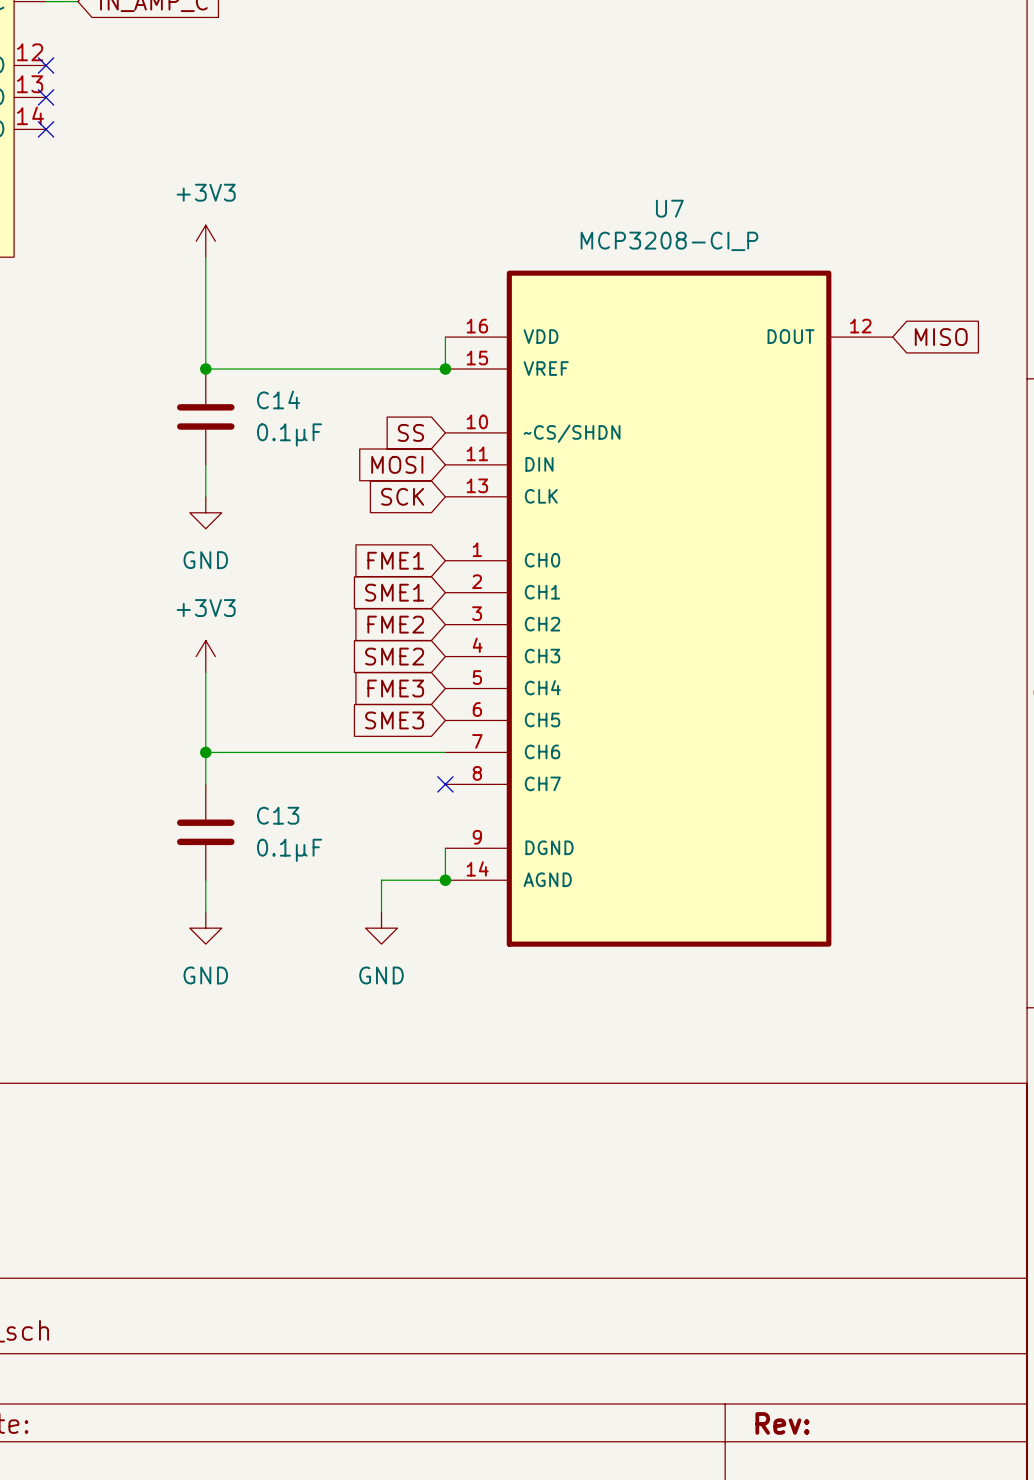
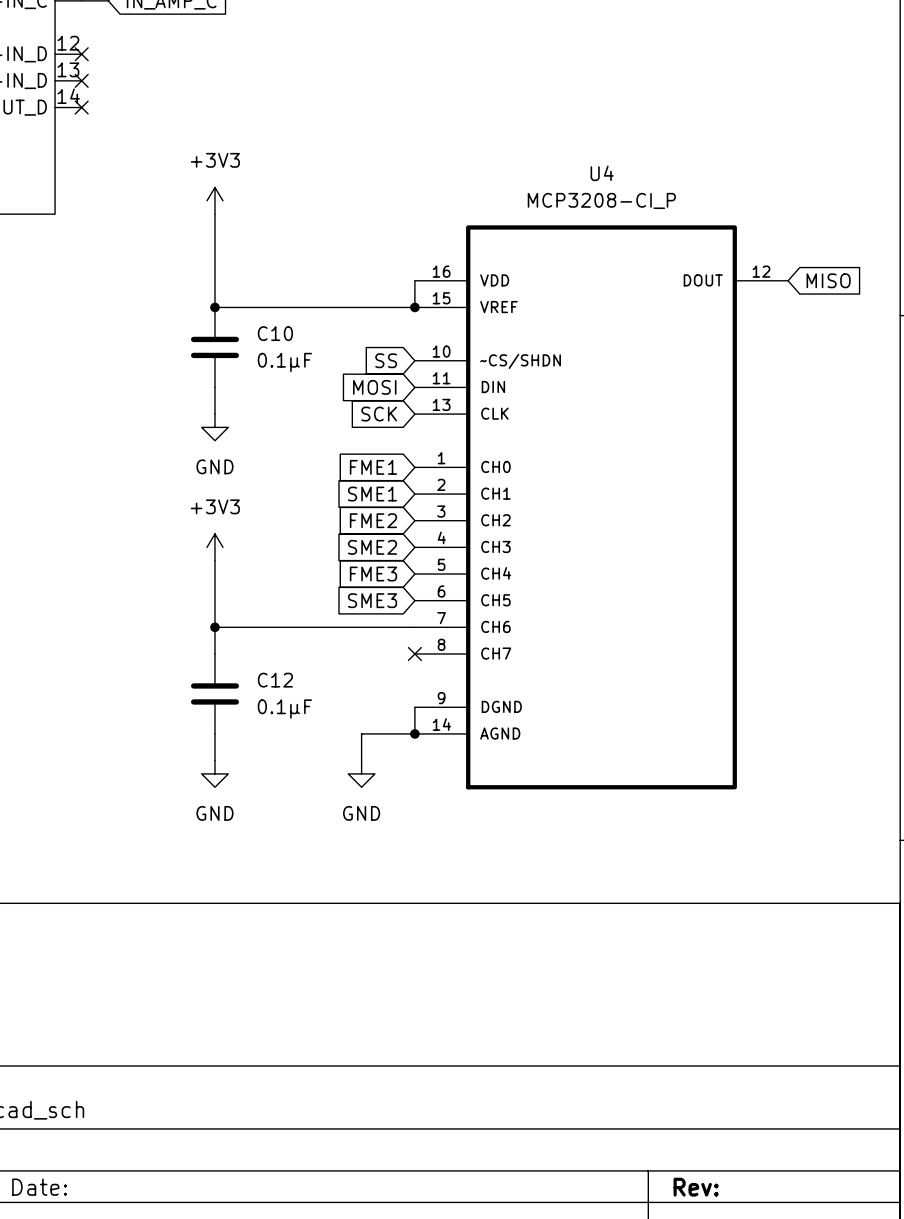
U7 name: U7 (669, 208) -> U4 (602, 173)
C14 name: C14 (278, 399) -> C10 (275, 333)
C13 name: C13 (278, 815) -> C12 (275, 680)

